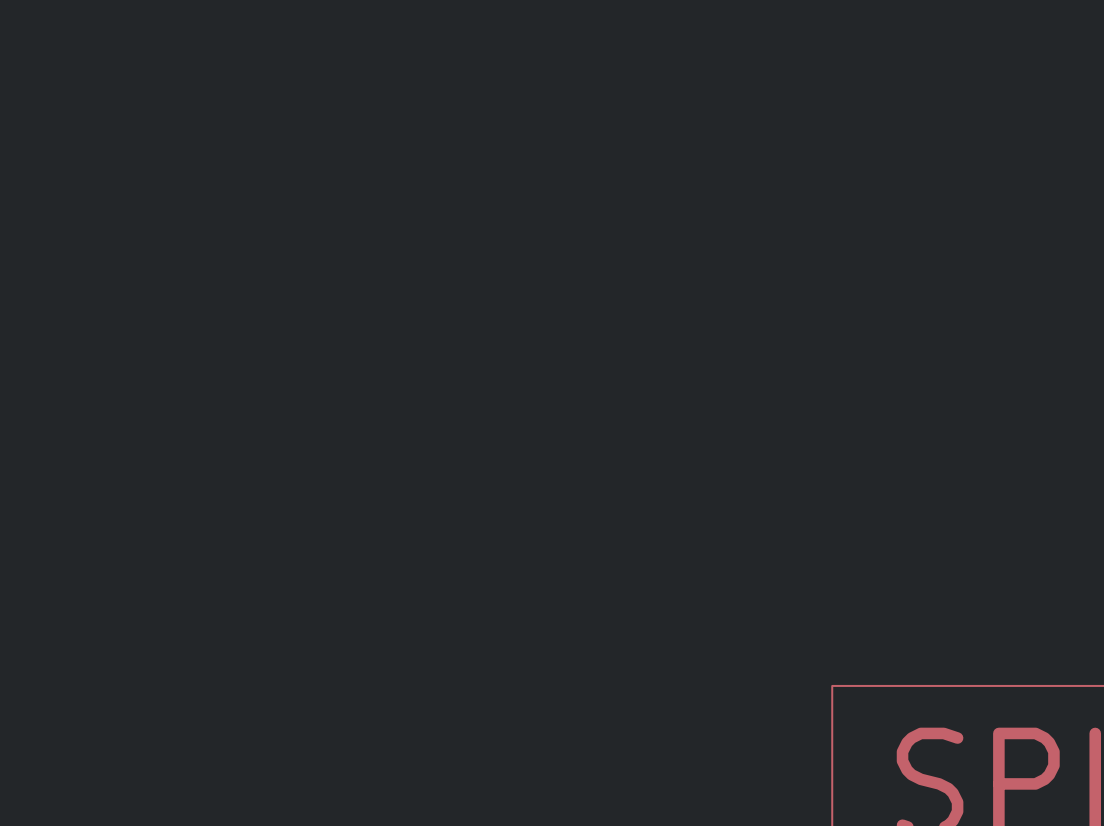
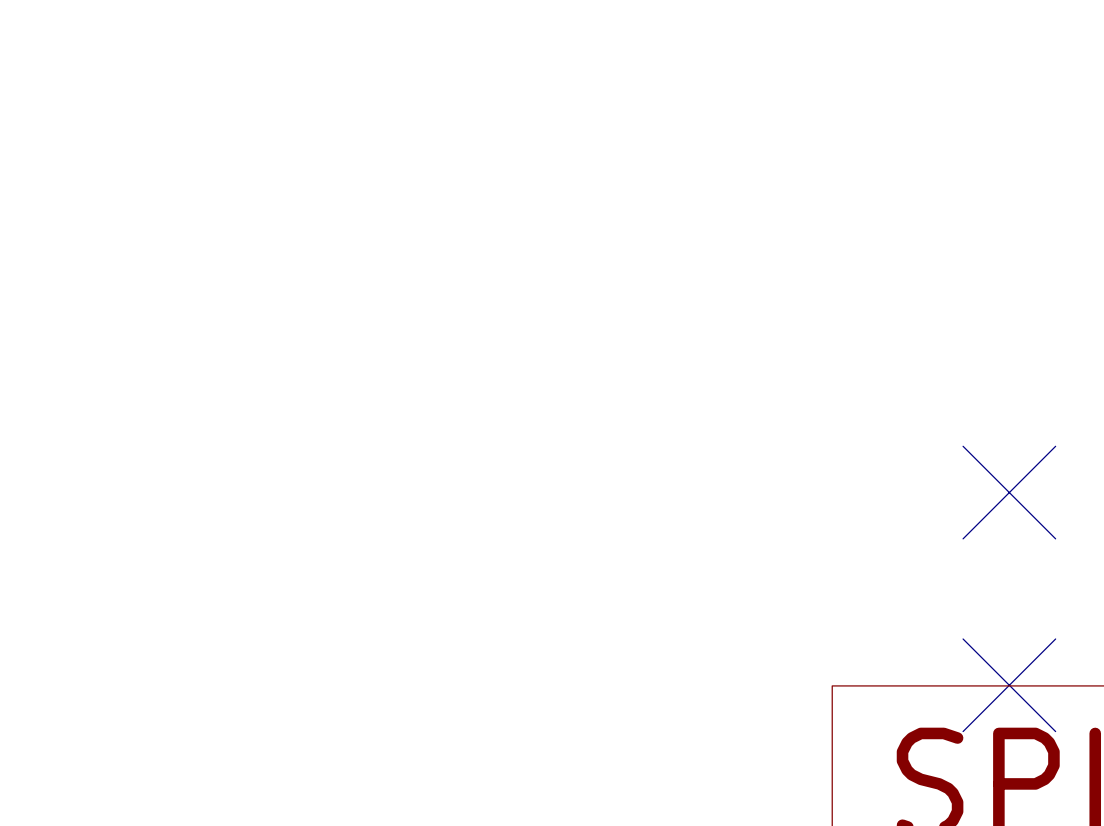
no-connect mark: none -> (1009, 492)
no-connect mark: none -> (1009, 685)

